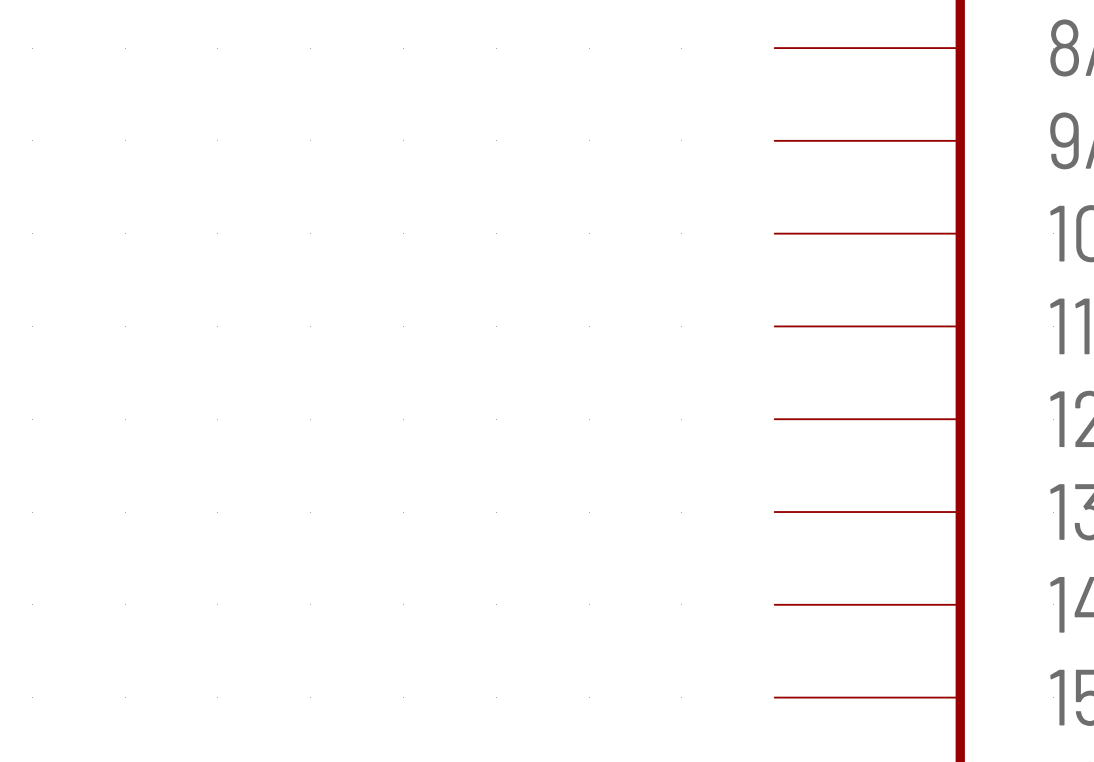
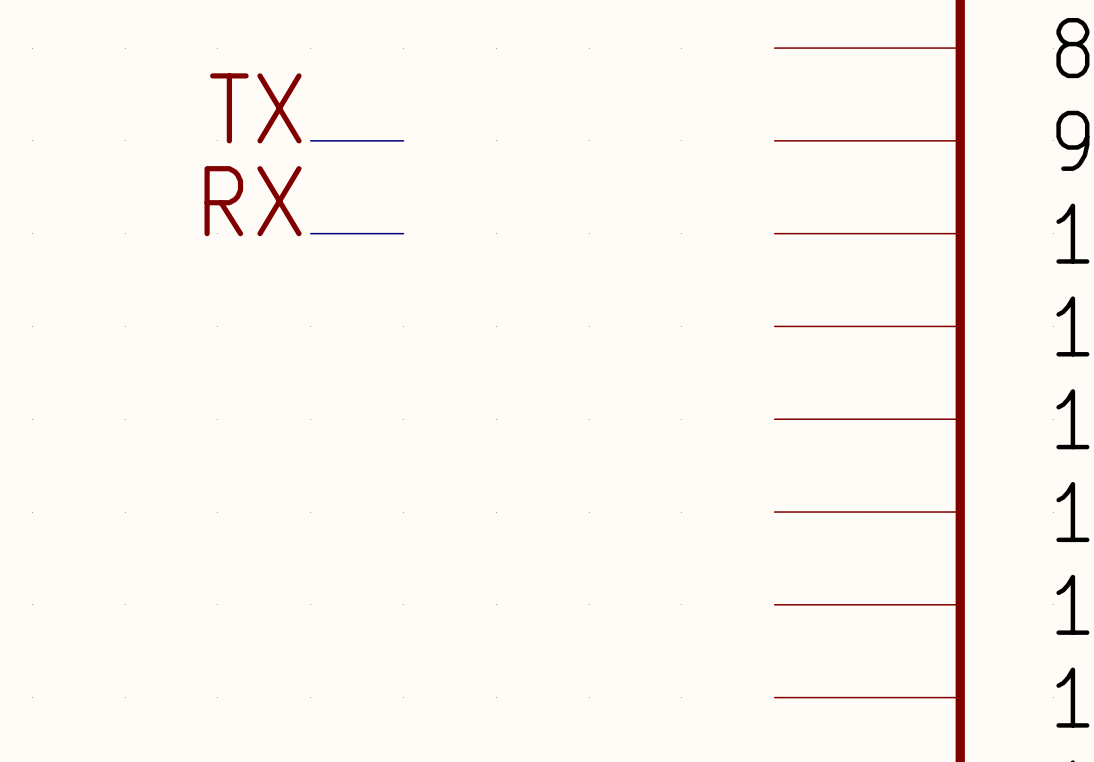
label: none -> TX (255, 108)
wire: none -> (310, 140) (403, 140)
label: none -> RX (253, 201)
wire: none -> (310, 233) (403, 233)

